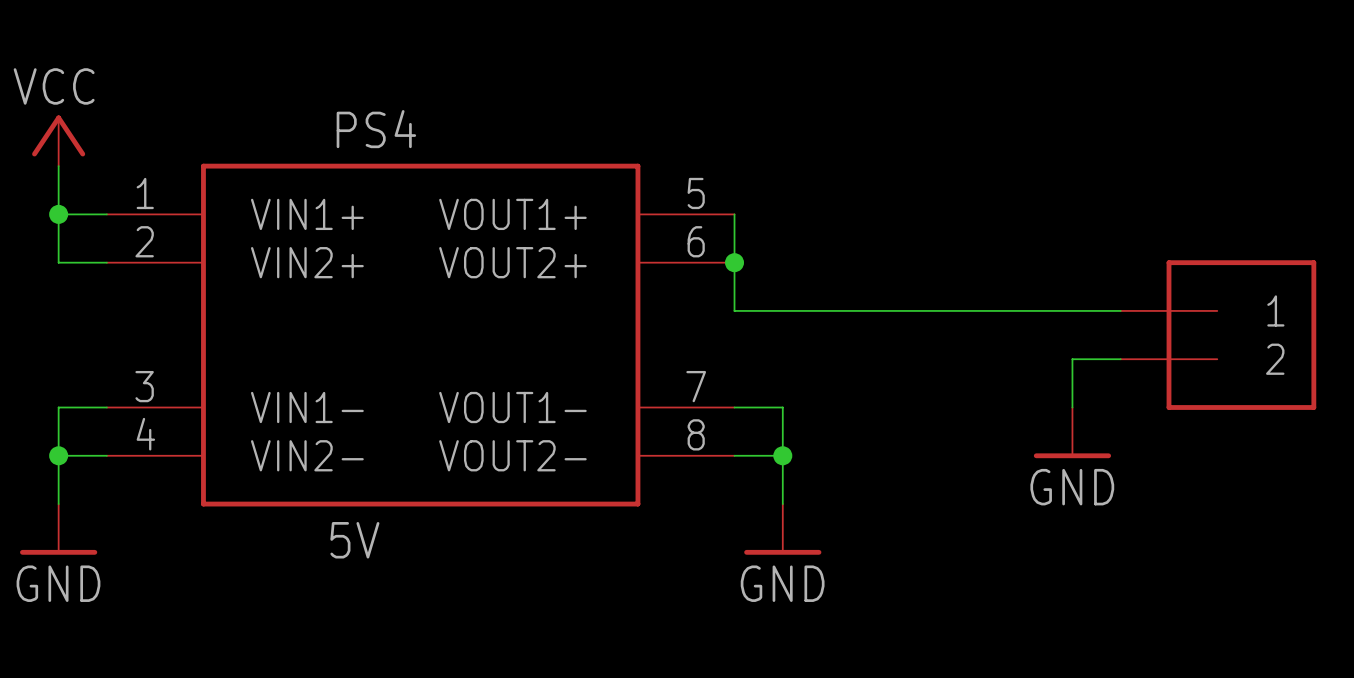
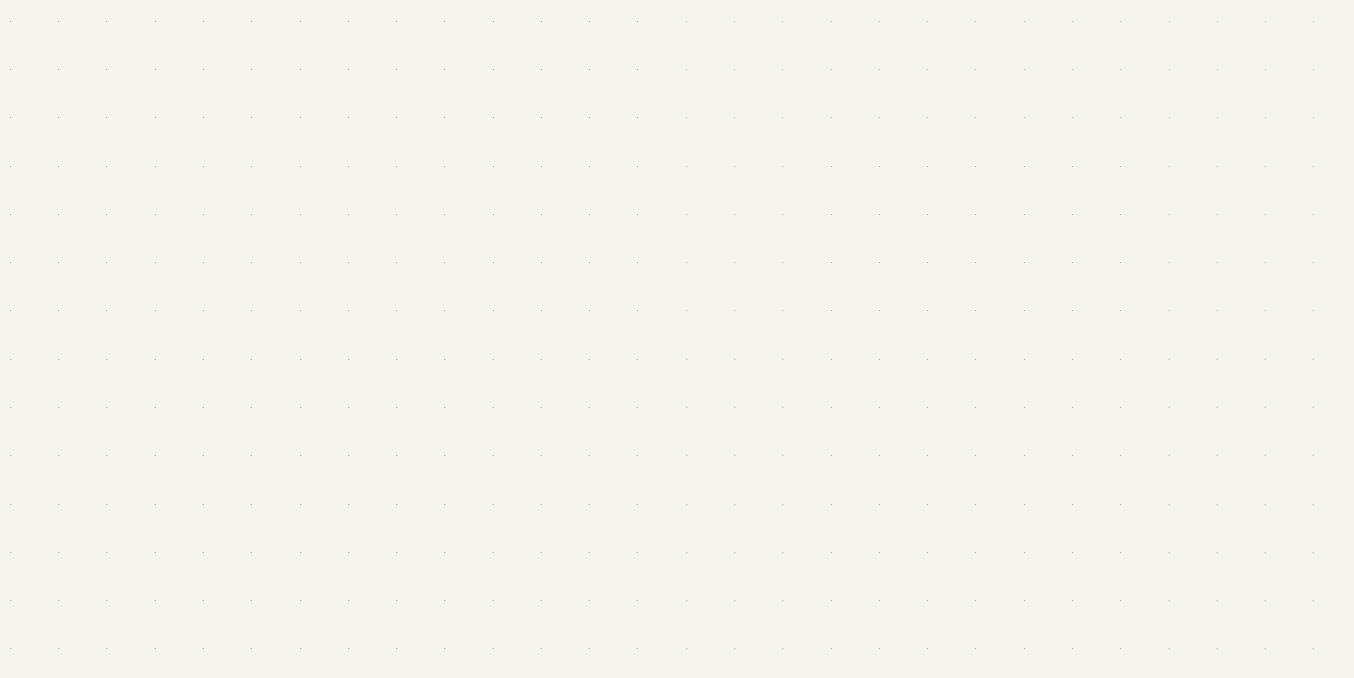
power symbol: VCC (58, 140) -> none
wire: (58, 166) (58, 262) (106, 262) -> none
wire: (58, 214) (106, 214) -> none
junction: (58, 214) -> none
wire: (734, 214) (734, 310) (1120, 310) -> none
junction: (734, 262) -> none
PS4: 5V (420, 335) -> none
part: (1218, 335) -> none
wire: (1120, 359) (1072, 359) (1072, 407) -> none
wire: (106, 407) (58, 407) (58, 504) -> none
wire: (734, 407) (782, 407) (782, 504) -> none
power symbol: GND (1072, 432) -> none
wire: (58, 455) (106, 455) -> none
junction: (58, 455) -> none
wire: (734, 455) (782, 455) -> none
junction: (782, 455) -> none
power symbol: GND (58, 529) -> none
power symbol: GND (782, 529) -> none

